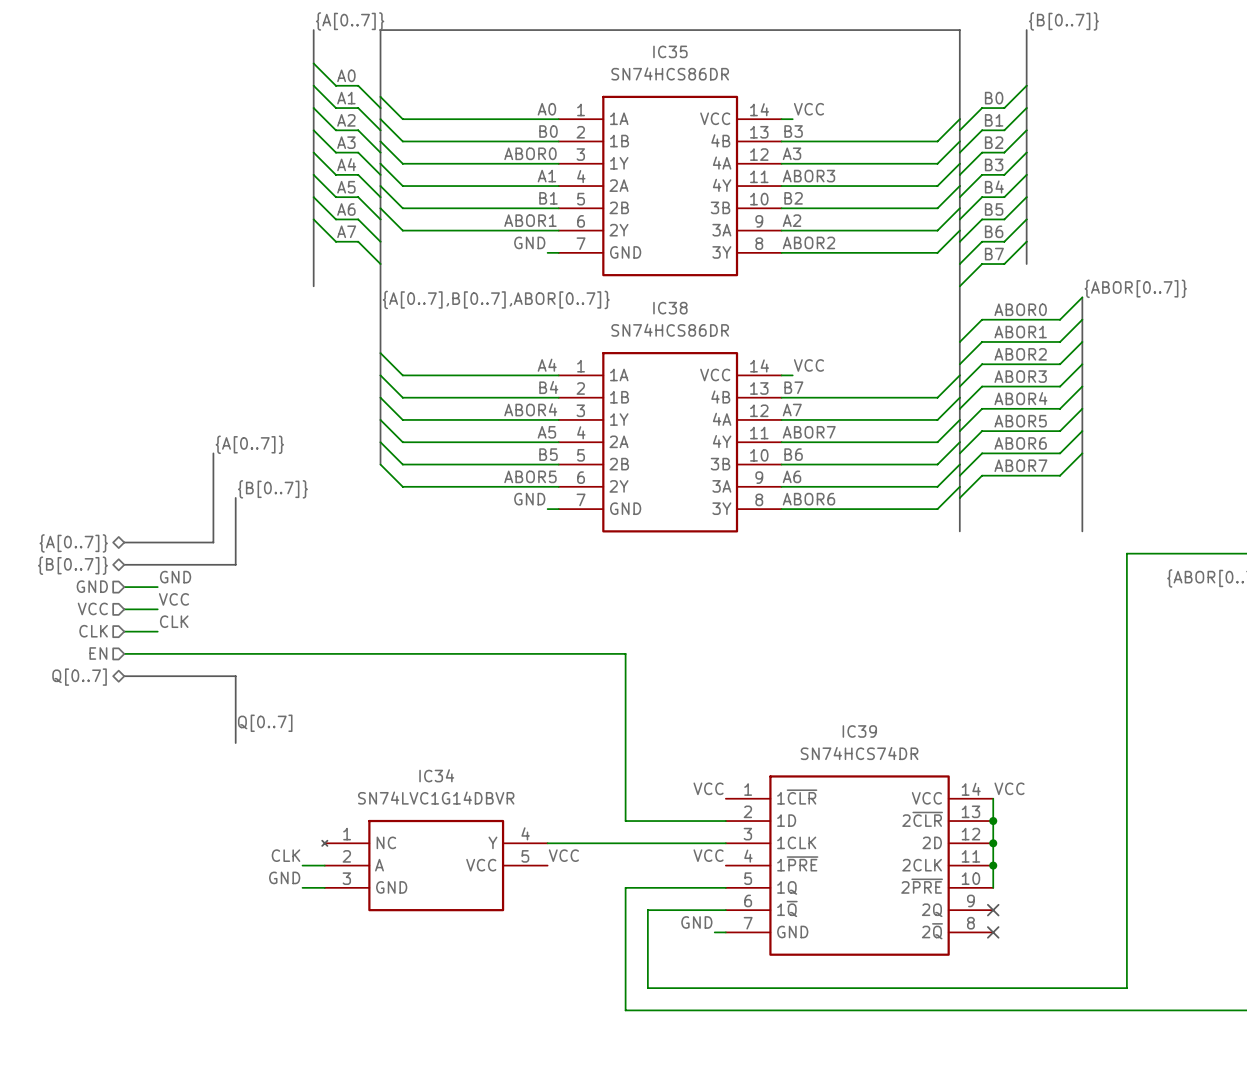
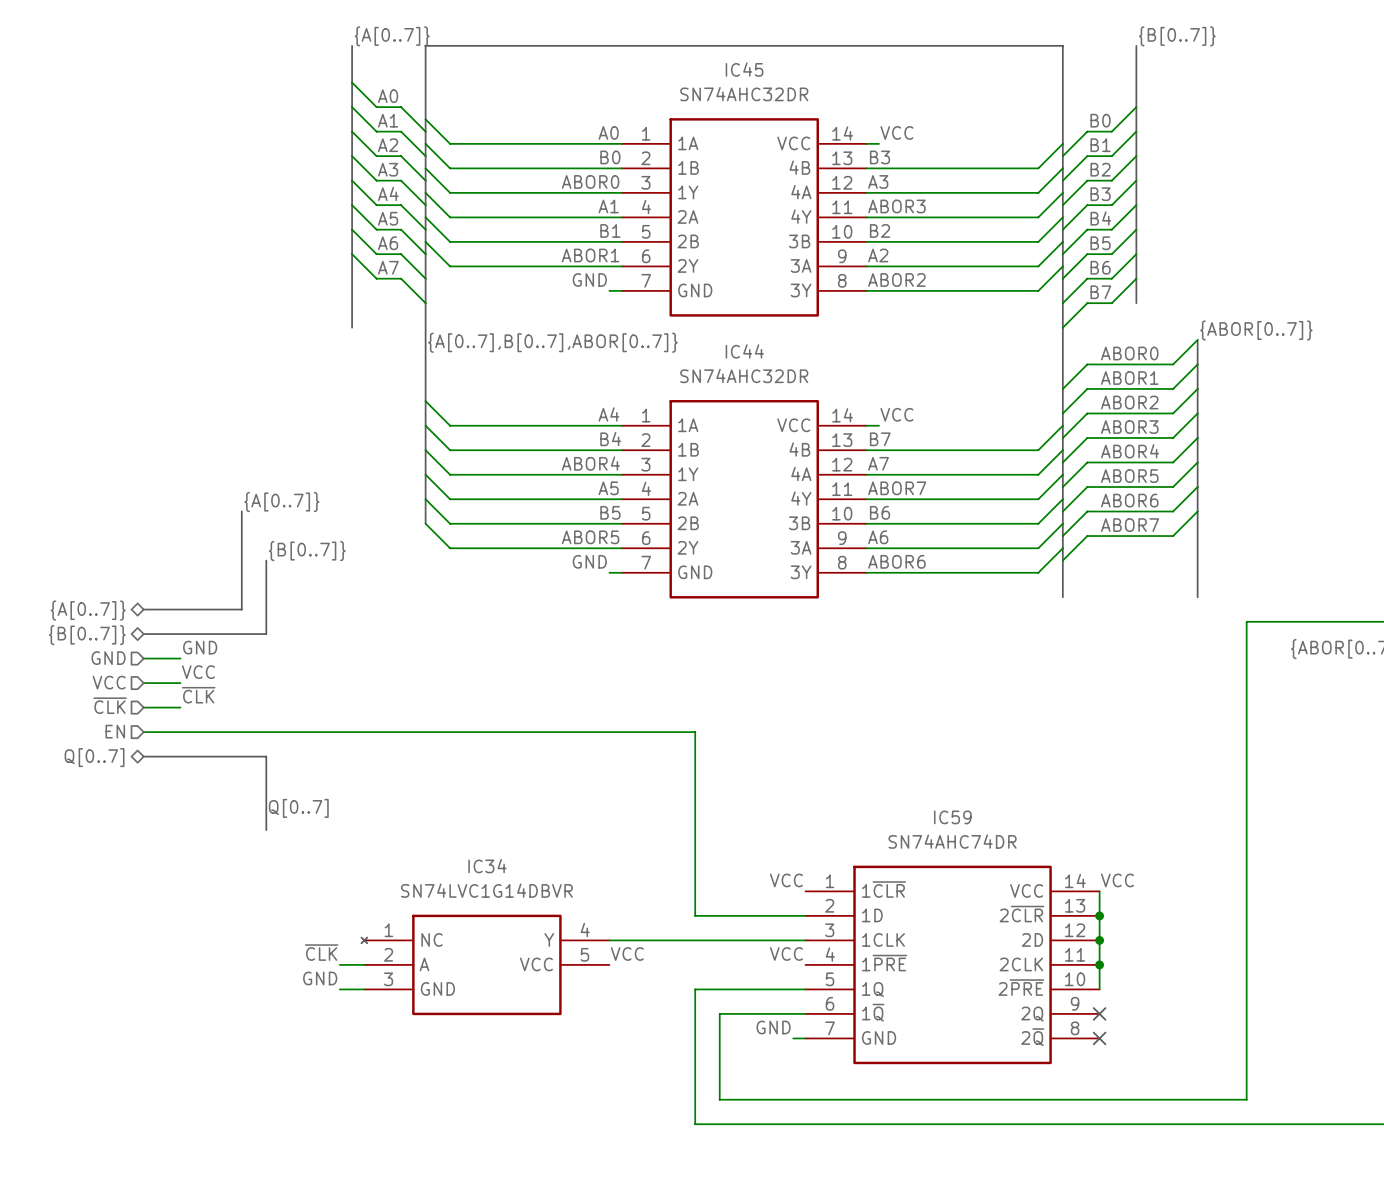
IC35 name: IC35 (670, 51) -> IC45 (744, 69)
IC35 value: SN74HCS86DR (670, 73) -> SN74AHC32DR (744, 94)
IC38 name: IC38 (670, 308) -> IC44 (744, 351)
IC38 value: SN74HCS86DR (670, 330) -> SN74AHC32DR (744, 375)
label: CLK (174, 621) -> ~{CLK} (198, 695)
hierarchical label: CLK (93, 631) -> ~{CLK} (110, 705)
IC39 name: IC39 (859, 731) -> IC59 (952, 817)
IC39 value: SN74HCS74DR (859, 753) -> SN74AHC74DR (952, 841)
label: CLK (286, 855) -> ~{CLK} (321, 952)

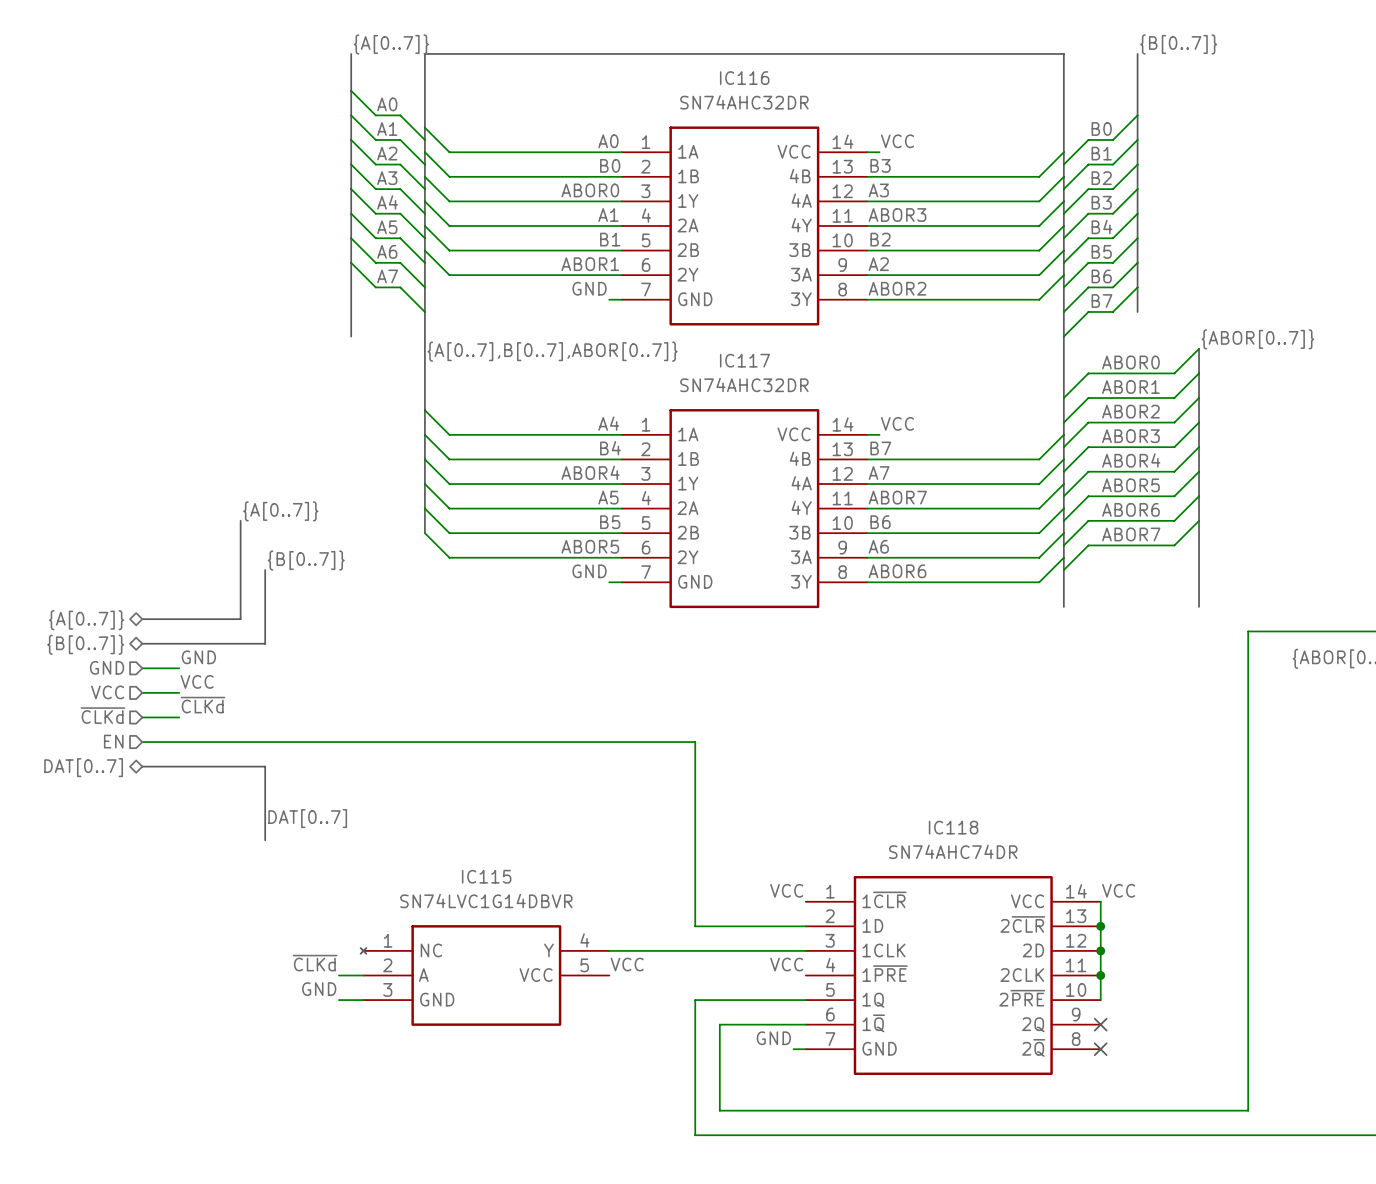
IC45 name: IC45 (744, 69) -> IC116 (744, 78)
IC44 name: IC44 (744, 351) -> IC117 (744, 360)
label: ~{CLK} (198, 695) -> ~{CLKd} (202, 705)
hierarchical label: ~{CLK} (110, 705) -> ~{CLKd} (102, 715)
hierarchical label: Q[0..7] (94, 757) -> DAT[0..7] (83, 767)
label: Q[0..7] (298, 808) -> DAT[0..7] (307, 818)
IC59 name: IC59 (952, 817) -> IC118 (953, 827)
IC34 name: IC34 (487, 866) -> IC115 (486, 876)
label: ~{CLK} (321, 952) -> ~{CLKd} (315, 963)

